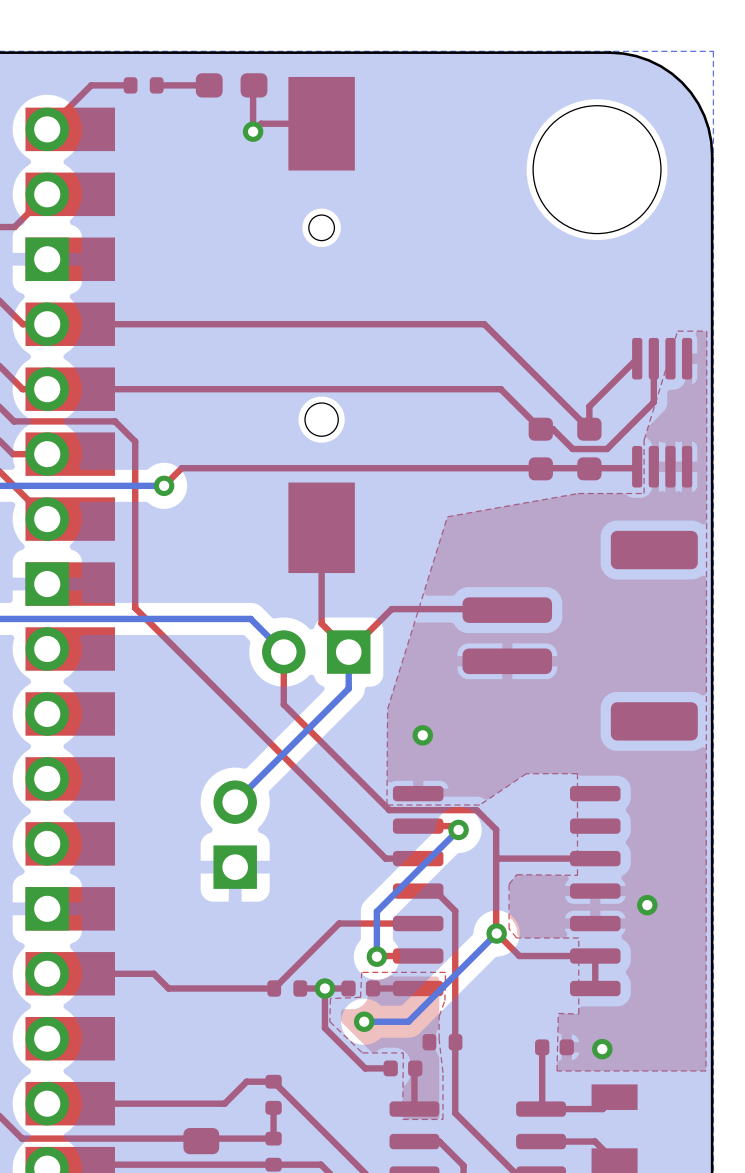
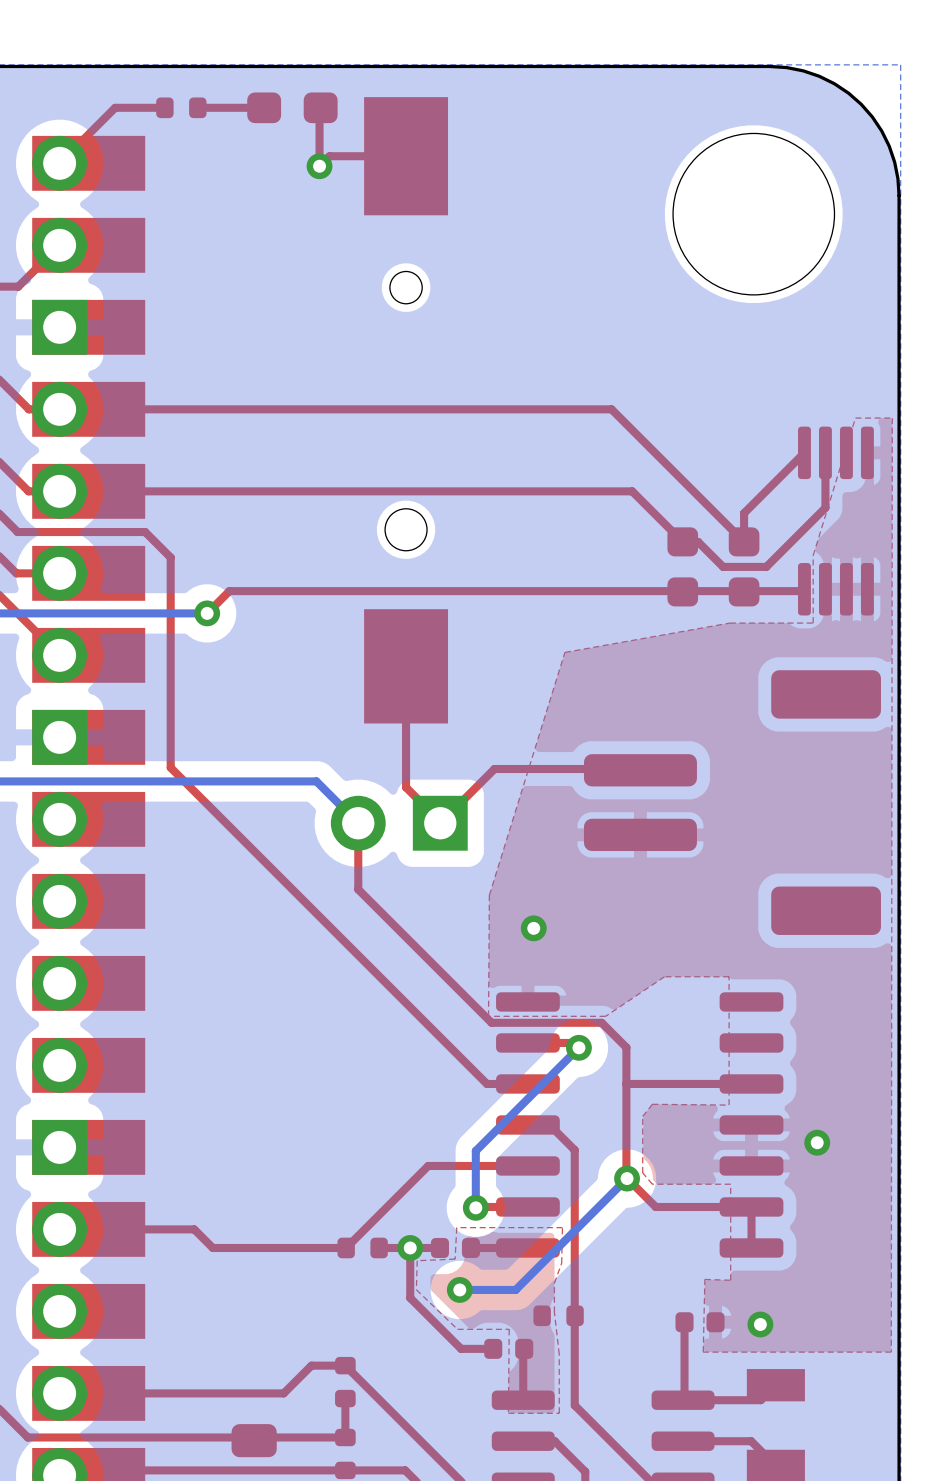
bottom track: (348, 652) (348, 688) (235, 802) -> none
part: (235, 834) -> none

